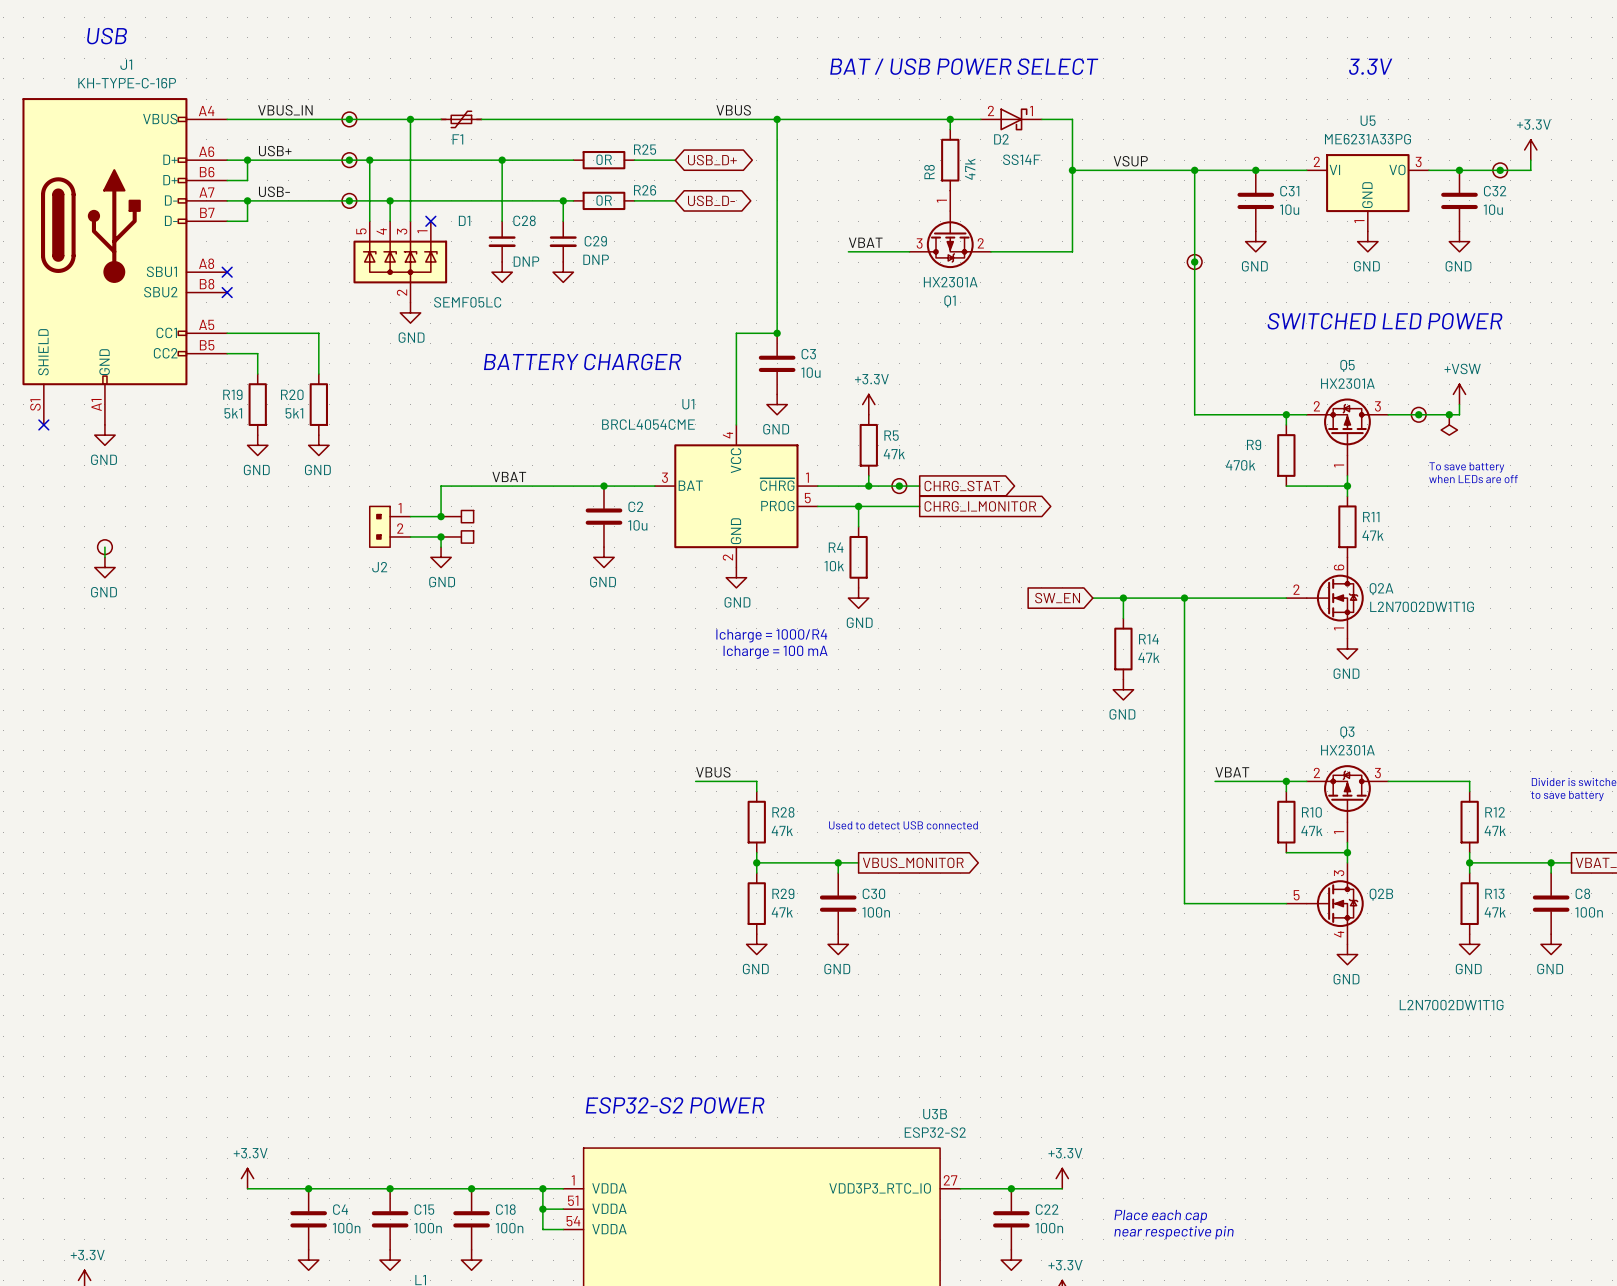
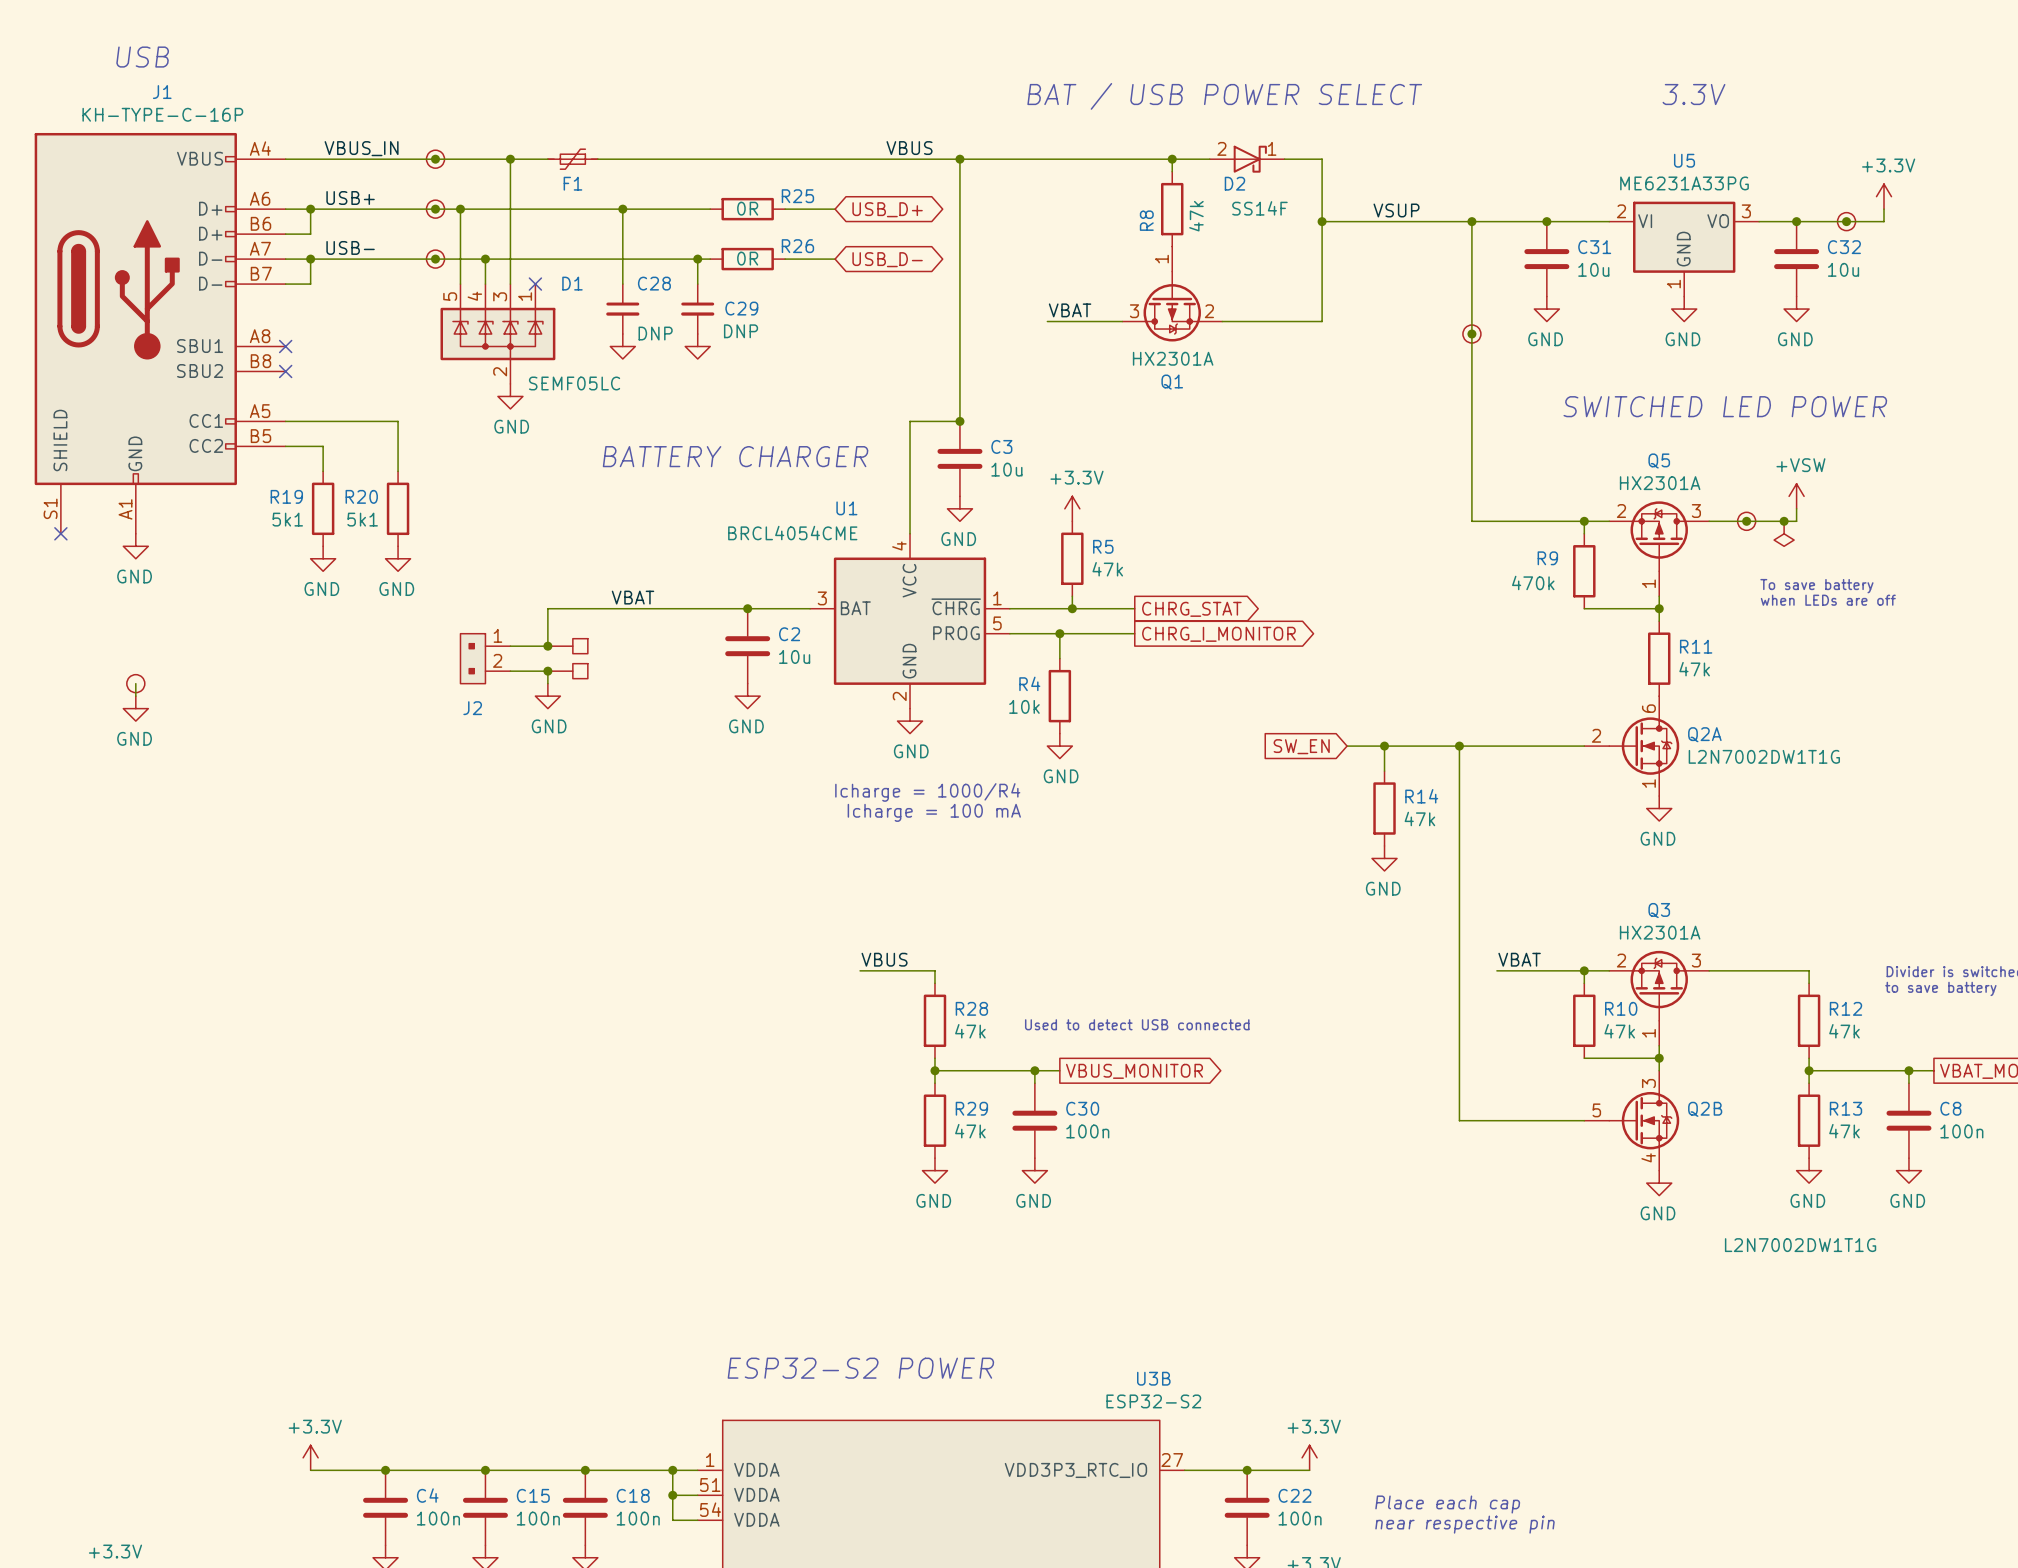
part: (899, 486) -> none
junction: (899, 486) -> none

